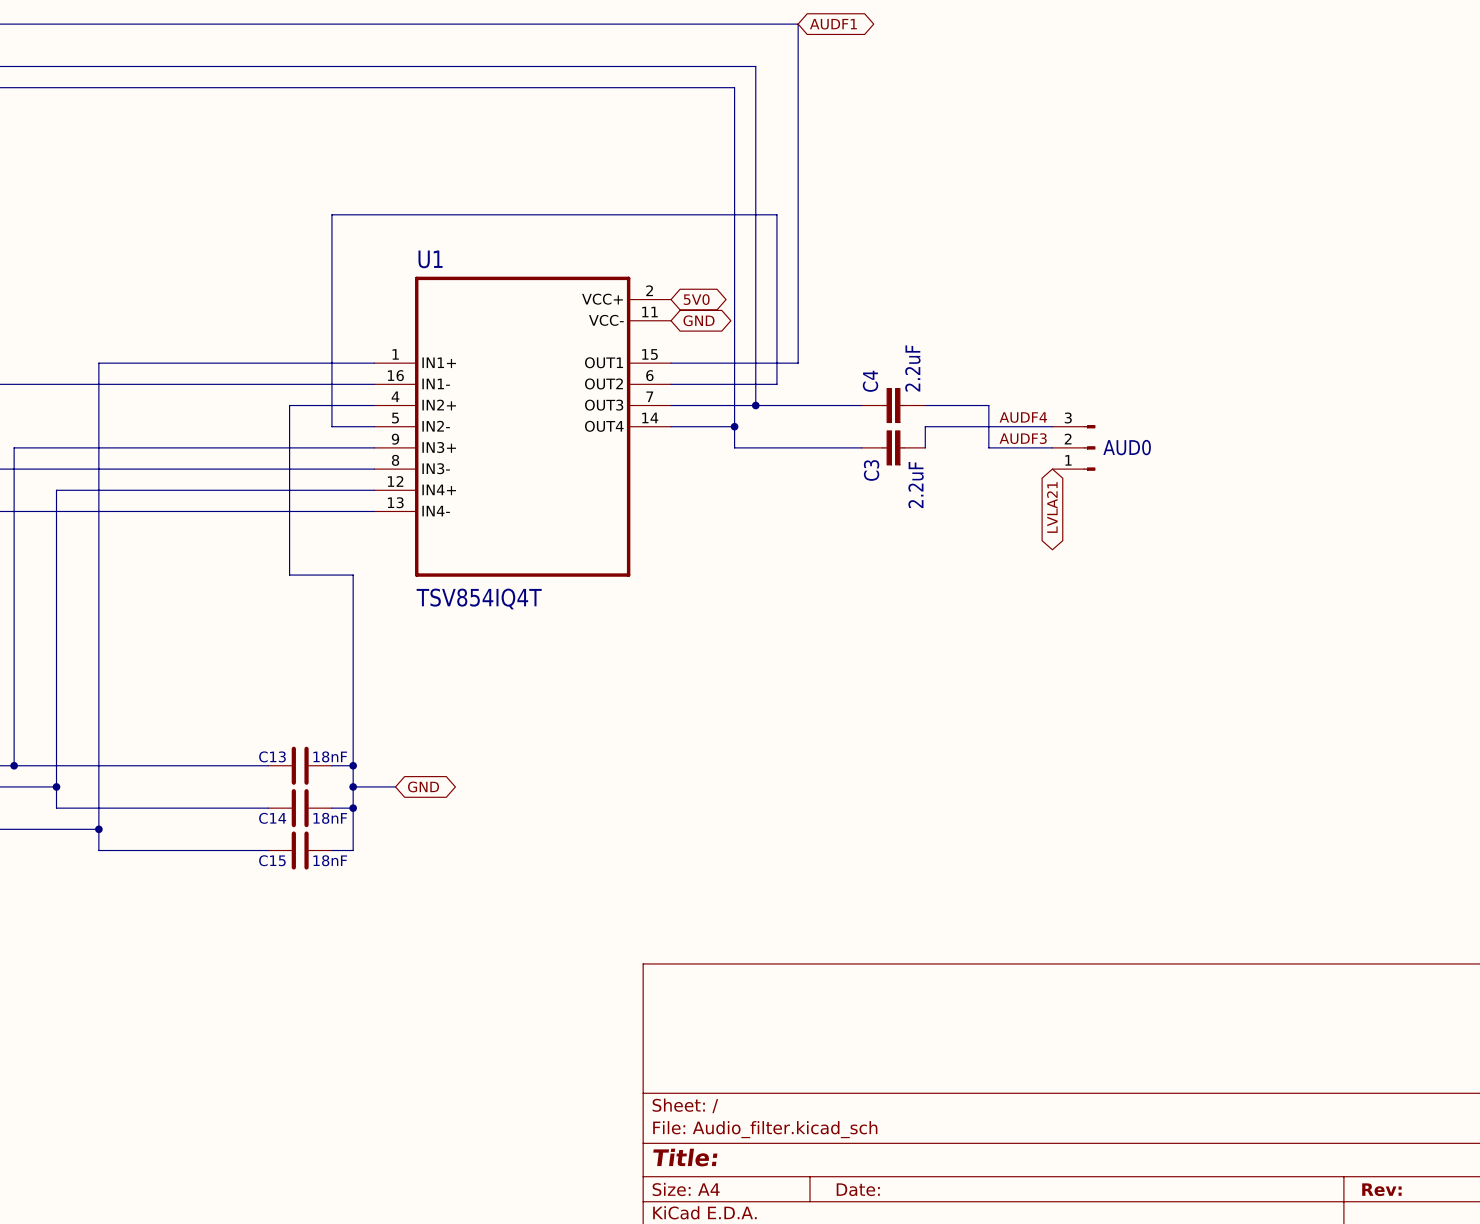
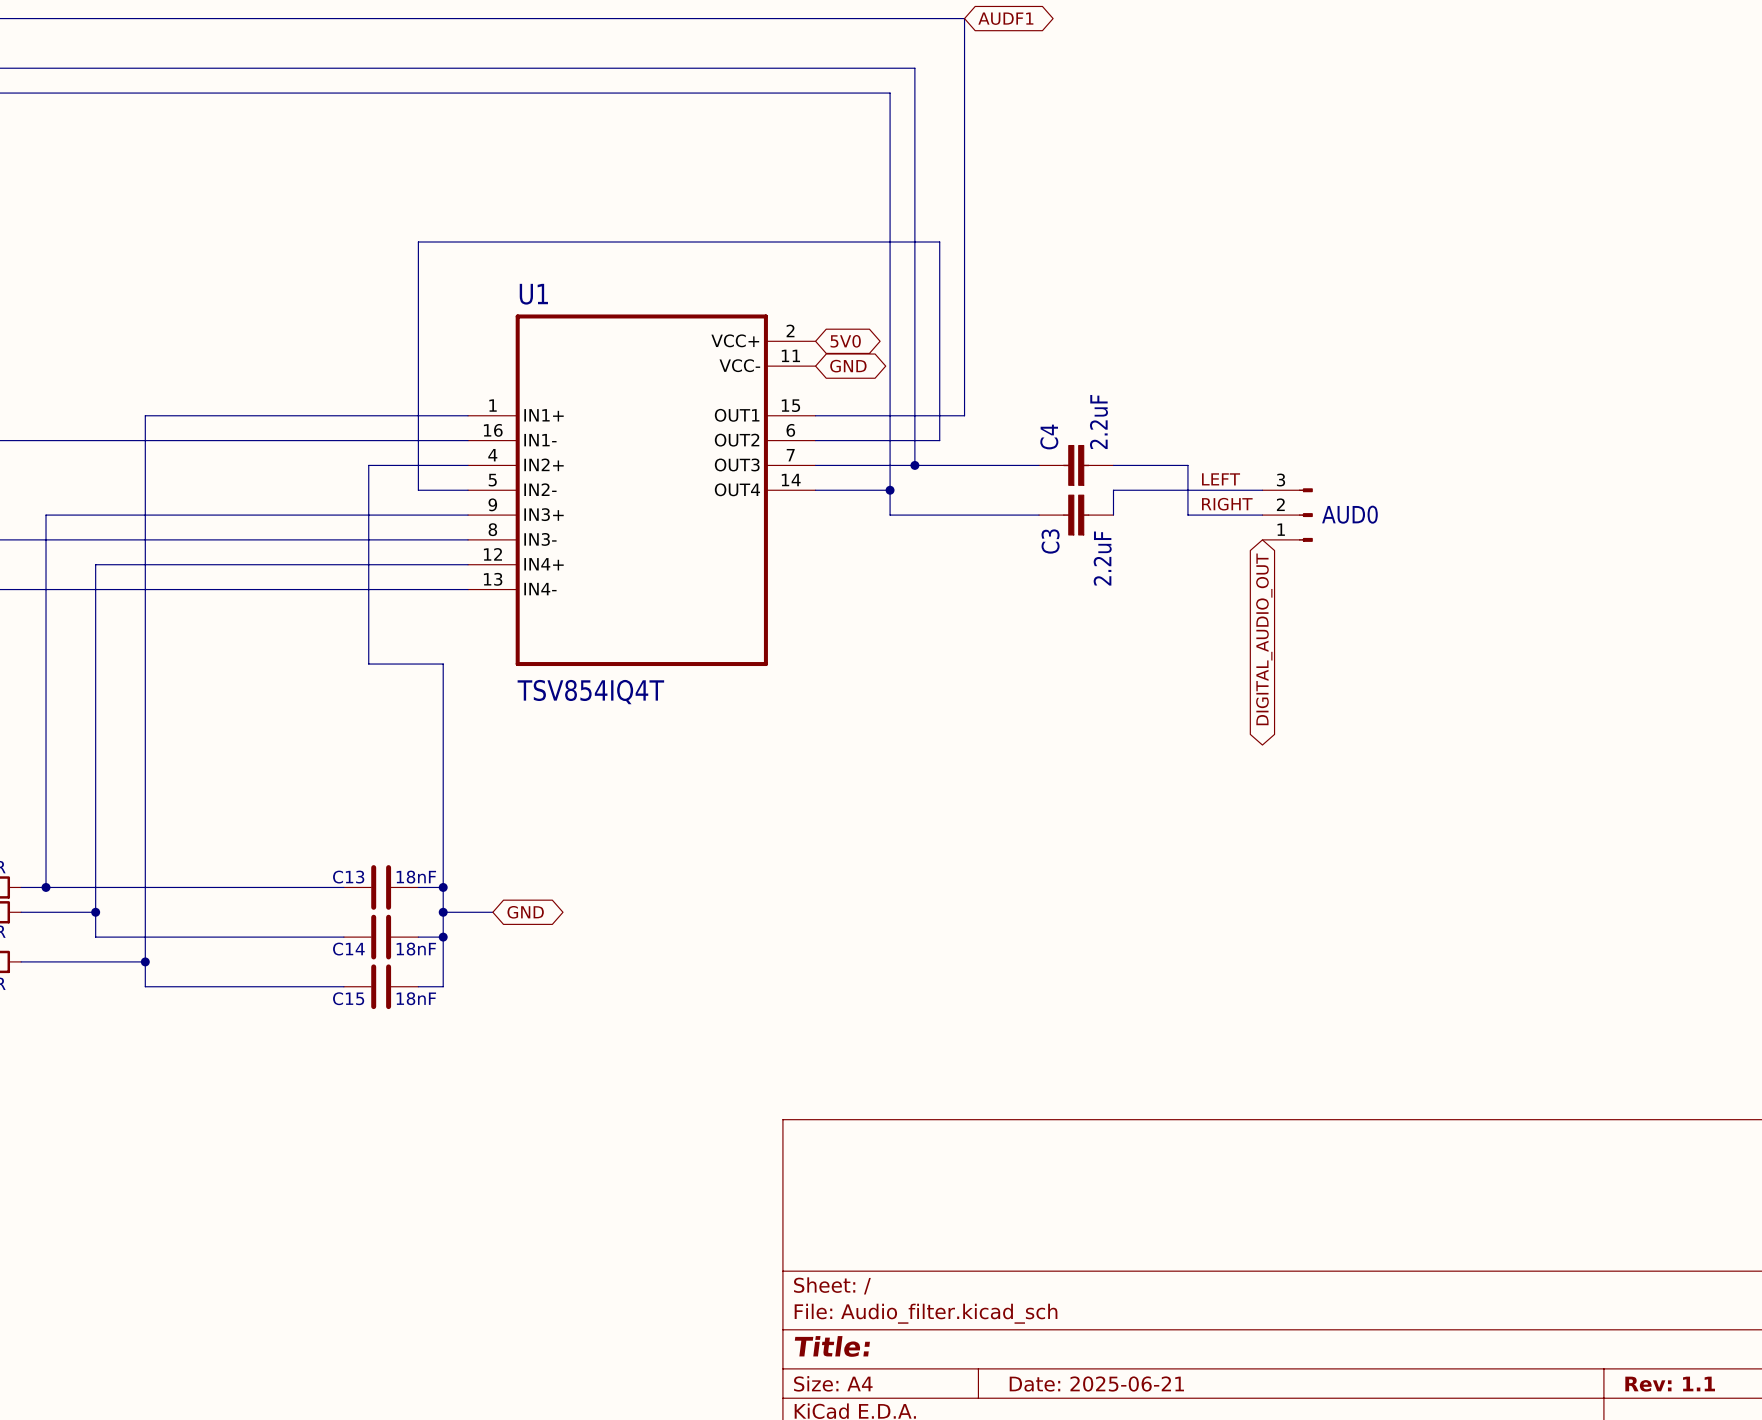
label: AUDF4 (1023, 417) -> LEFT (1221, 479)
label: AUDF3 (1023, 438) -> RIGHT (1227, 504)
global label: LVLA21 (1052, 507) -> DIGITAL_AUDIO_OUT (1264, 639)
title block: Date: (858, 1189) -> Date: 2025-06-21 (1096, 1384)
title block: Rev: (1381, 1189) -> Rev: 1.1 (1670, 1384)

